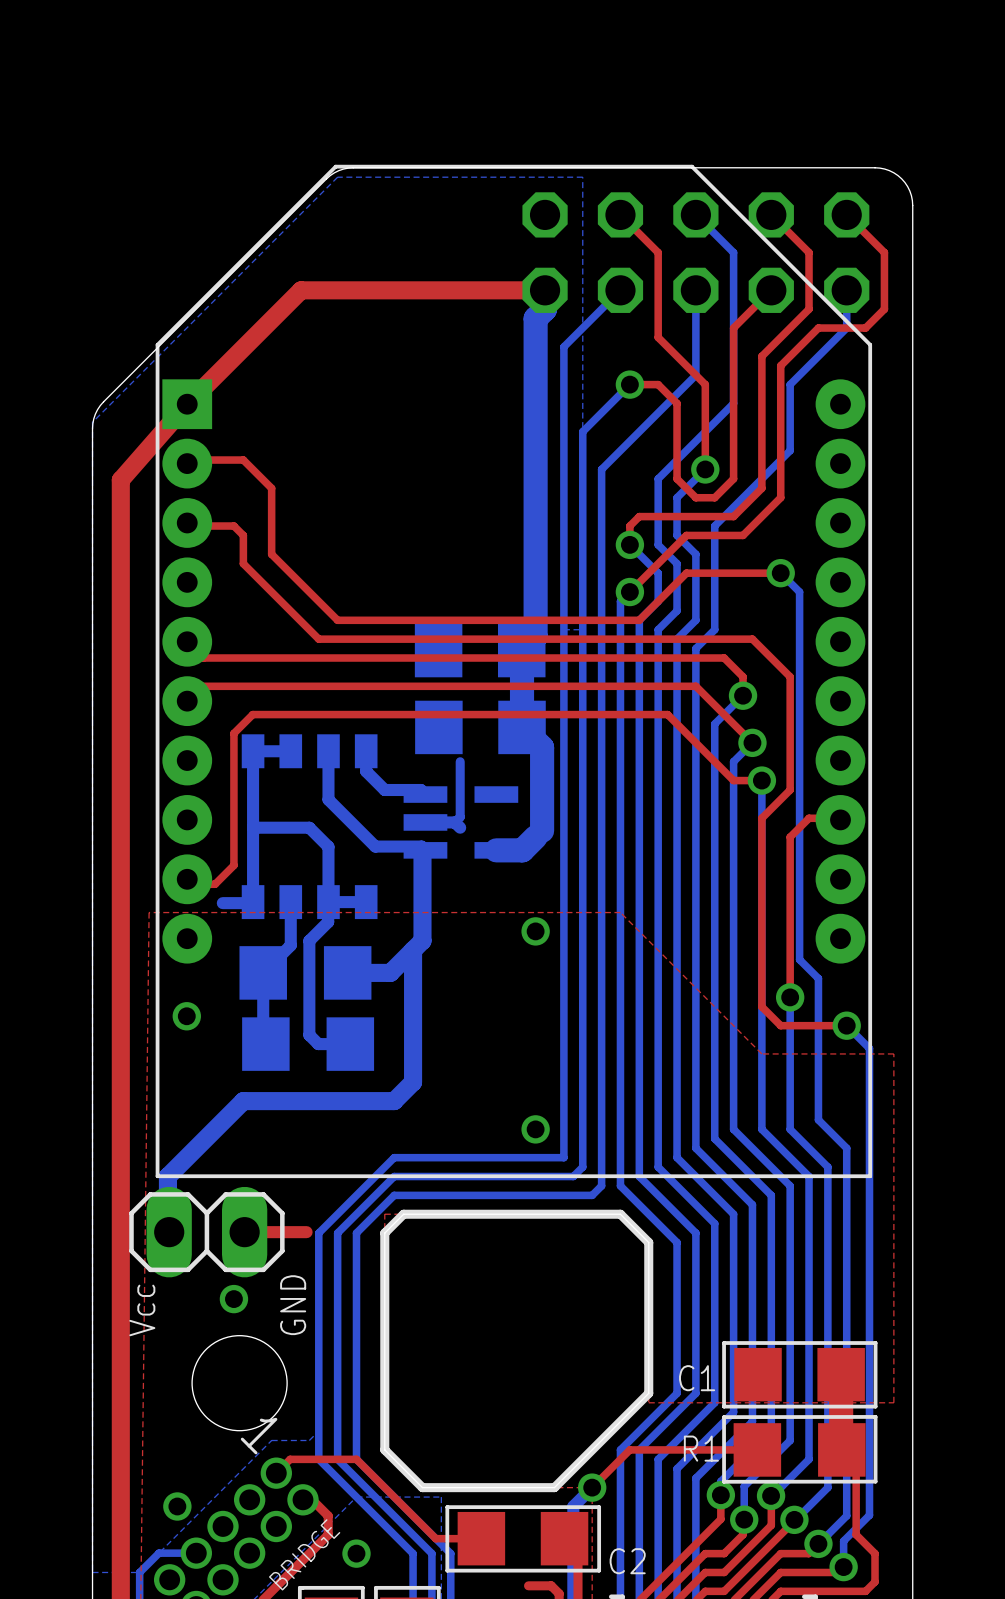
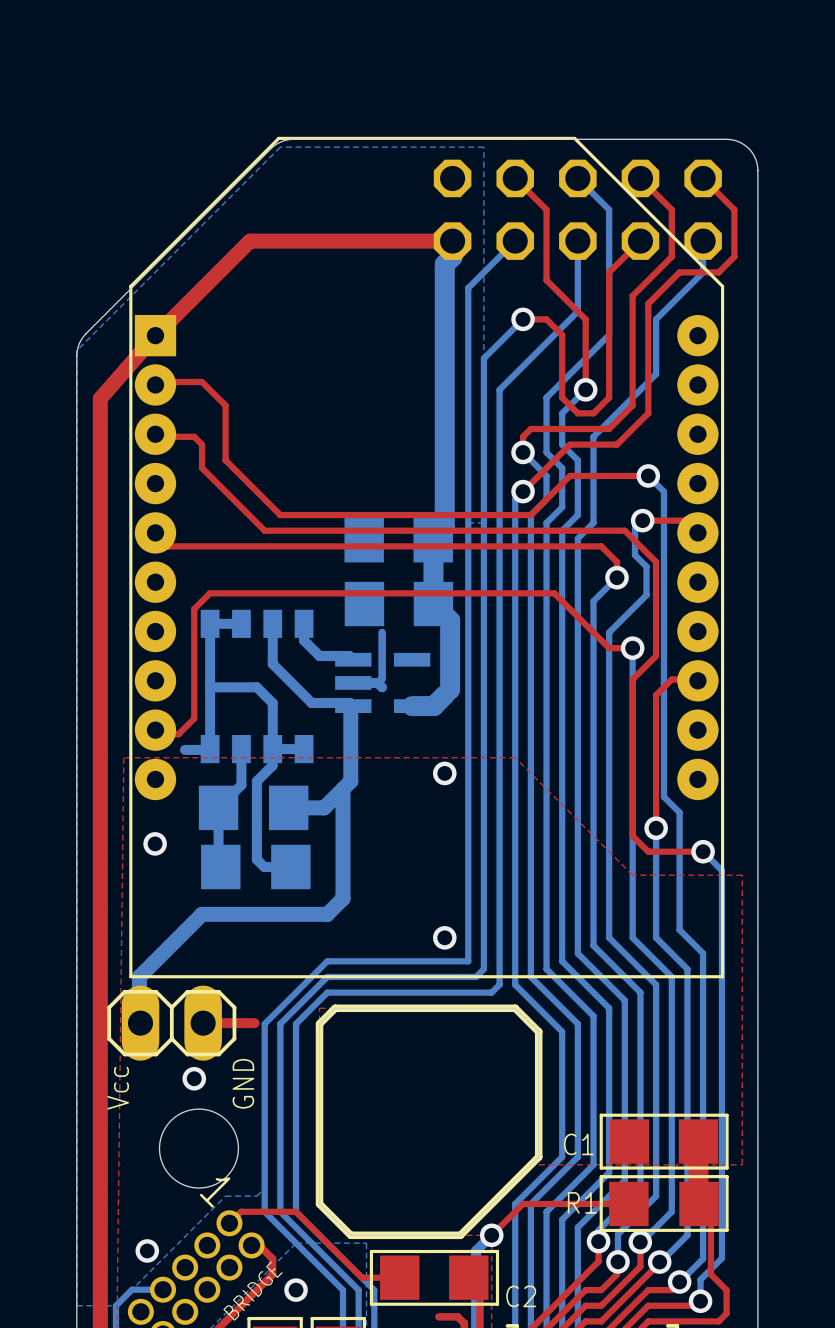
bottom track: none -> (642, 520) (635, 528) (635, 555) (646, 566) (646, 595) (624, 616)
top track: none -> (642, 520) (684, 520) (697, 532)
top track: (187, 701) (202, 686) (695, 686) (752, 742) -> none
via position: (752, 742) -> (642, 520)

